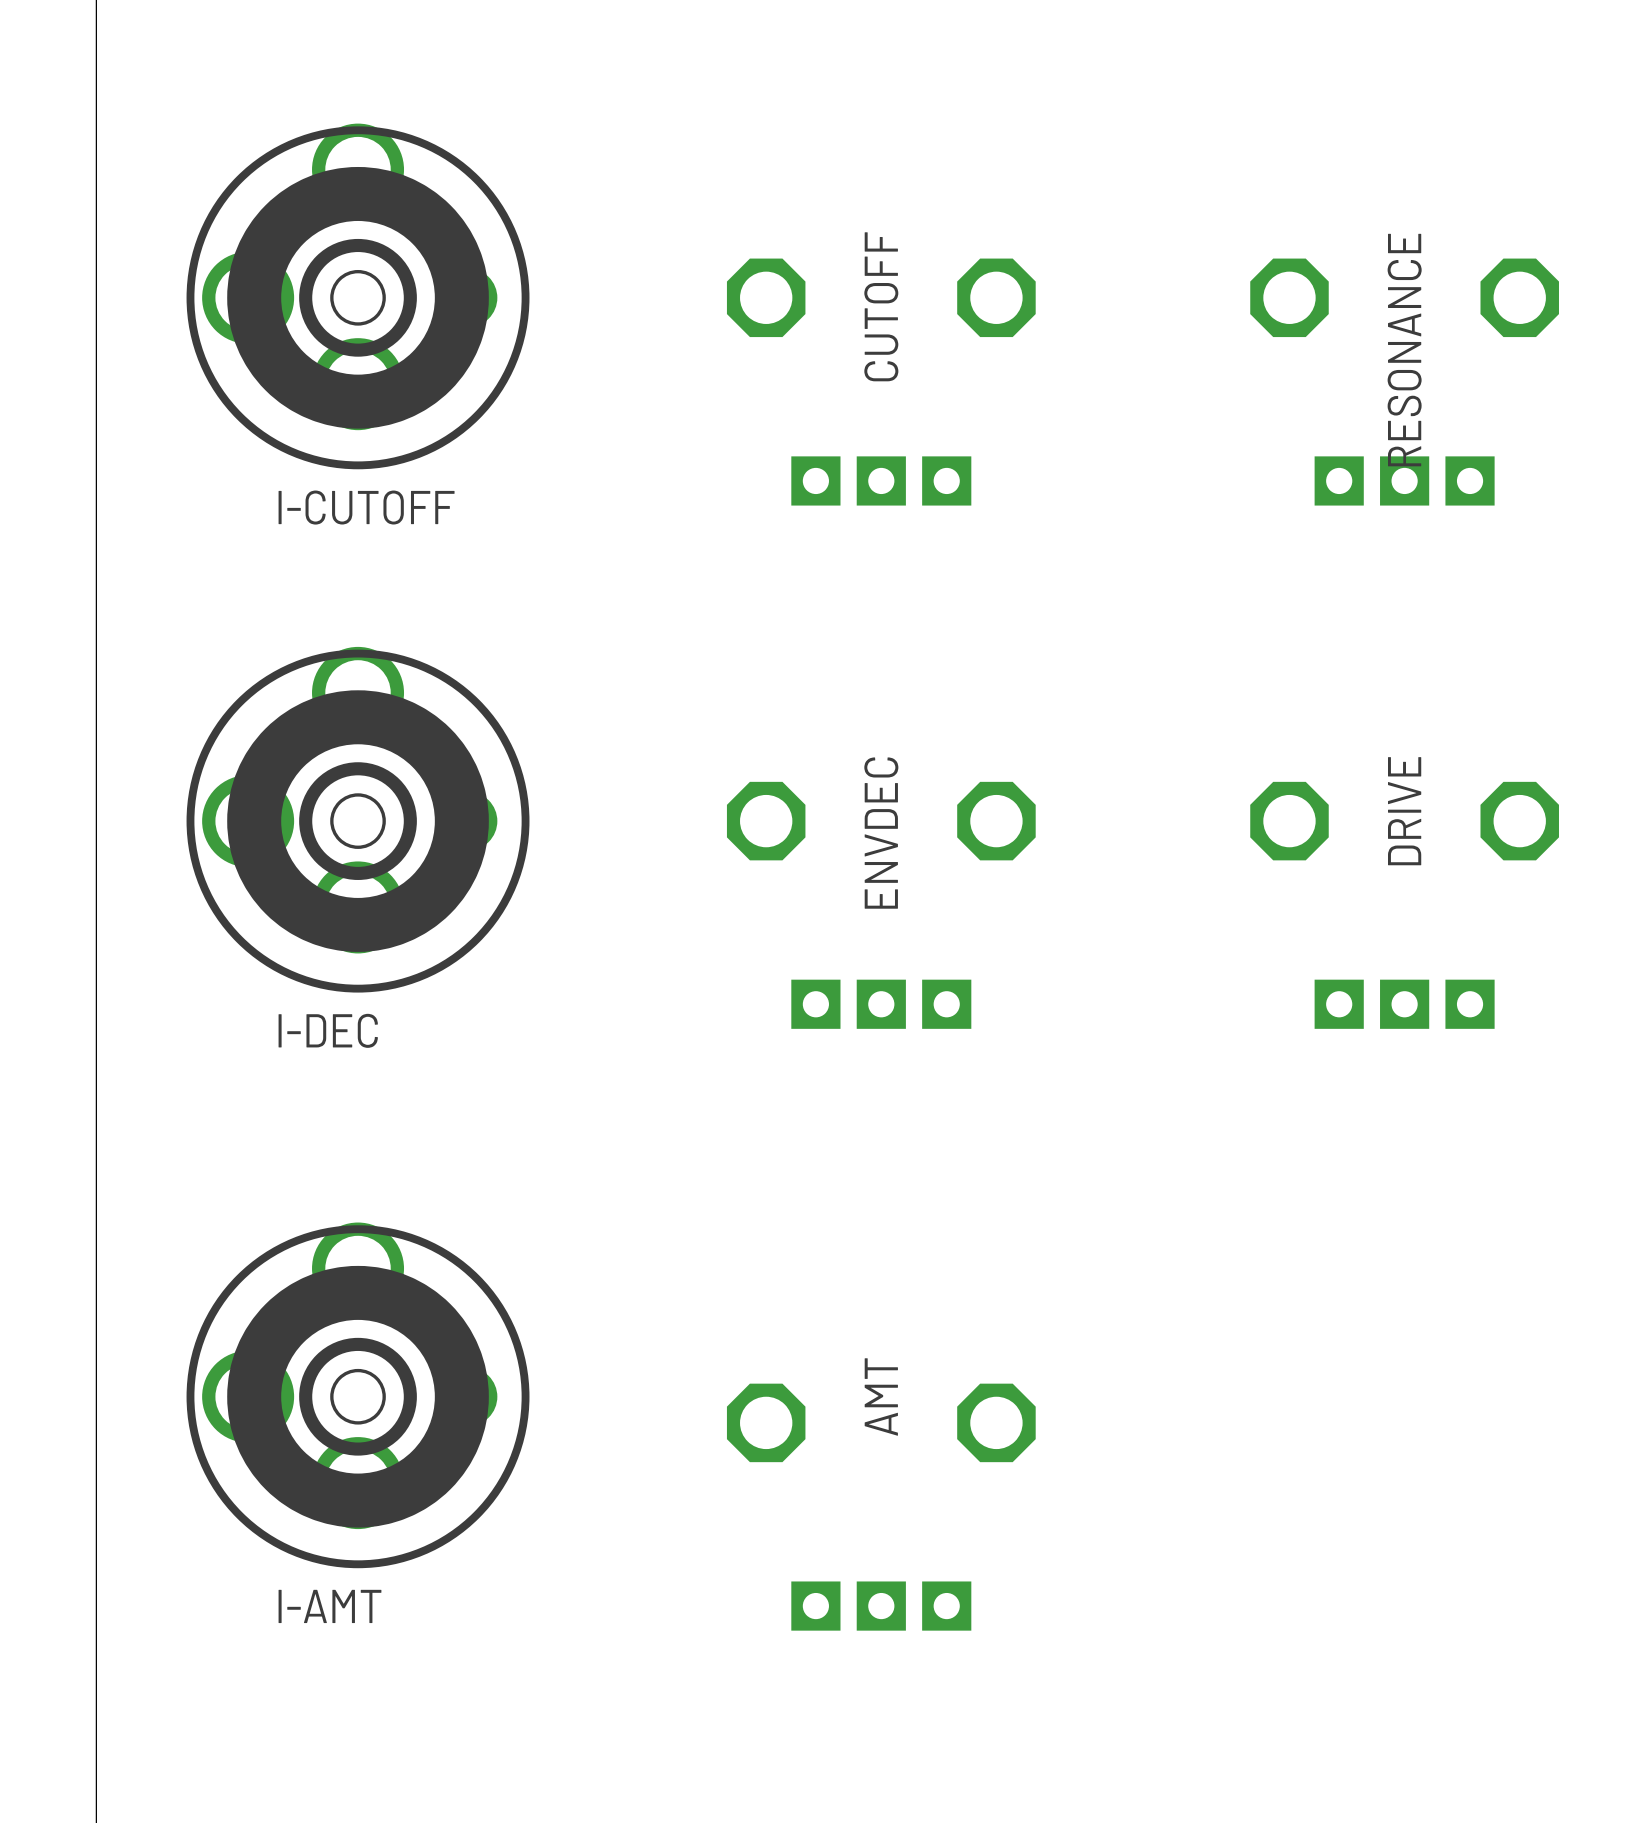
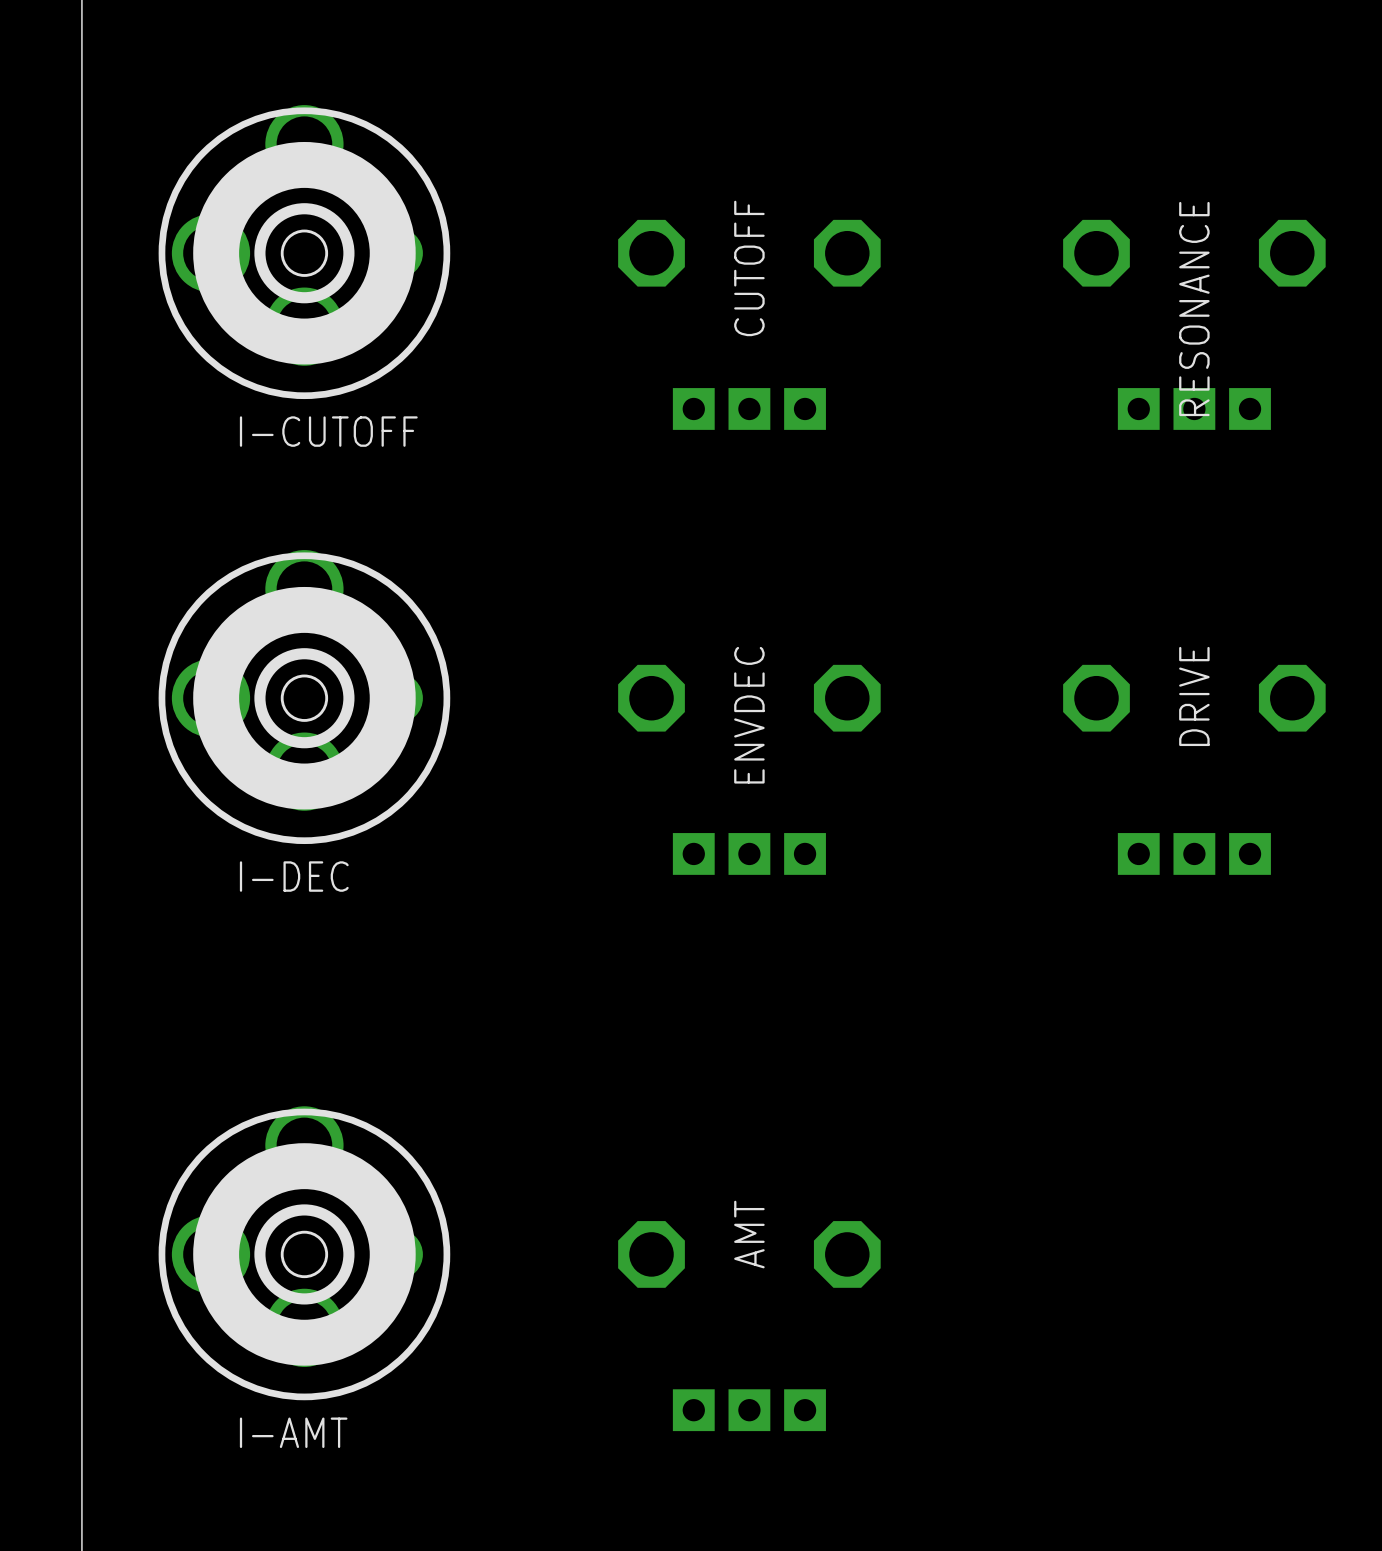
I-AMT position: (358, 1395) -> (304, 1253)
AMT position: (881, 1507) -> (749, 1326)

